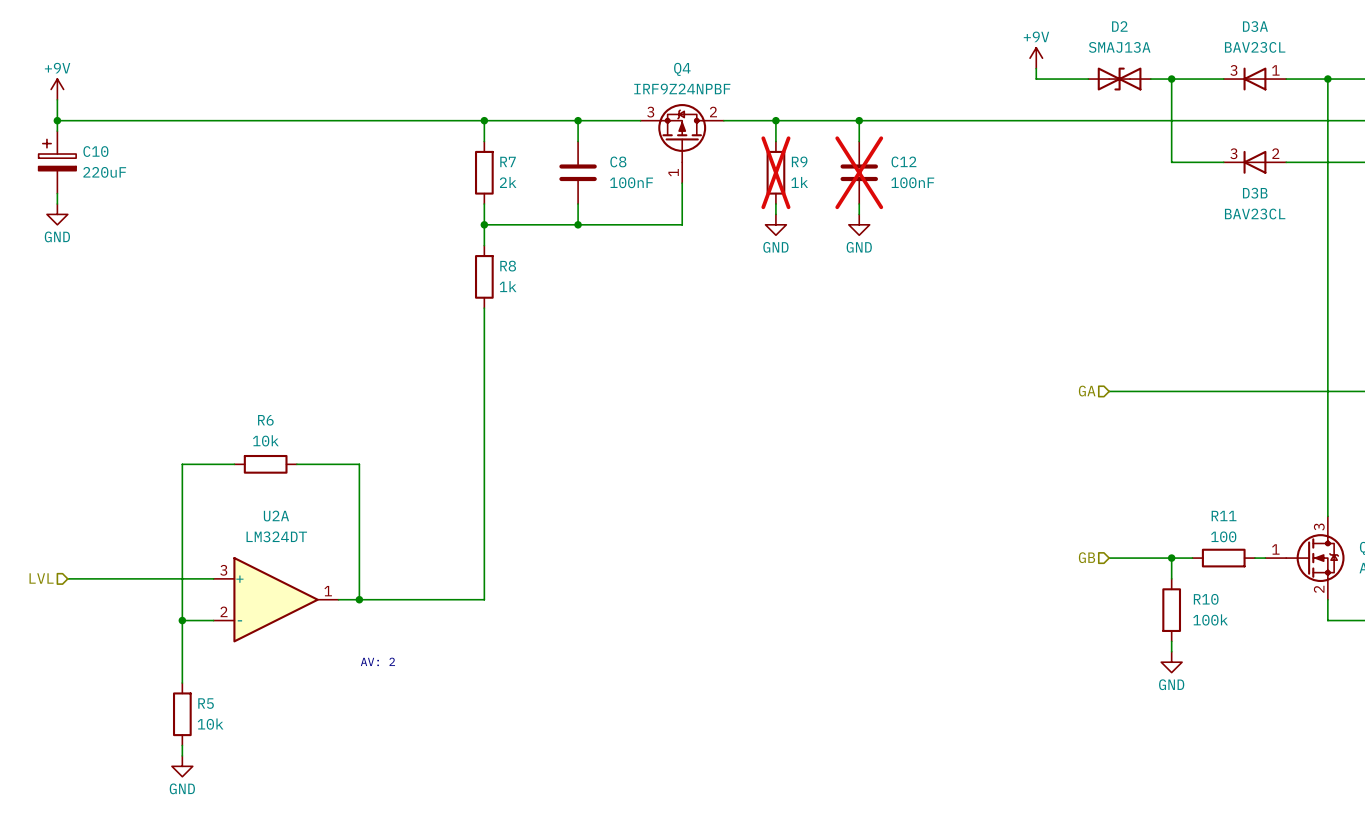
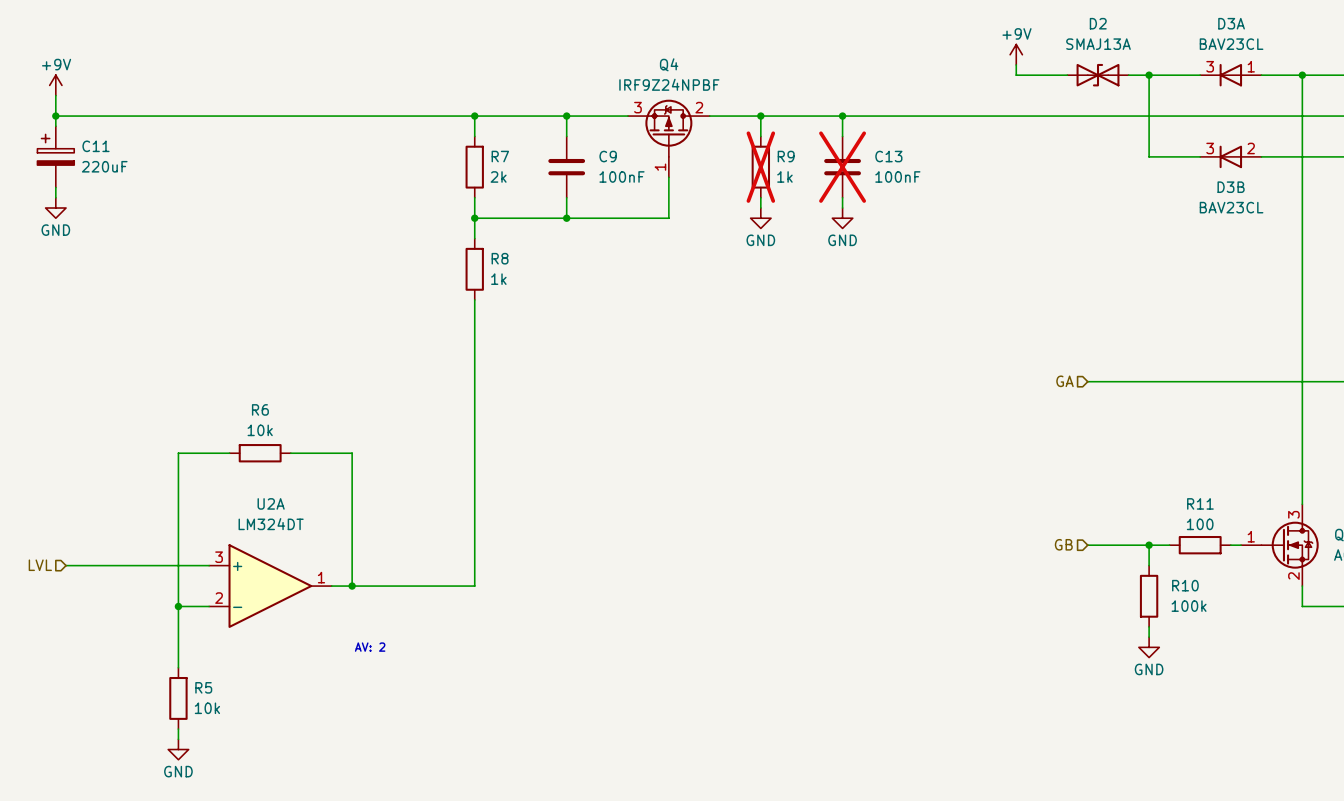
C10 name: C10 (95, 151) -> C11 (95, 146)
C8 name: C8 (618, 161) -> C9 (608, 156)
C12 name: C12 (903, 161) -> C13 (888, 156)

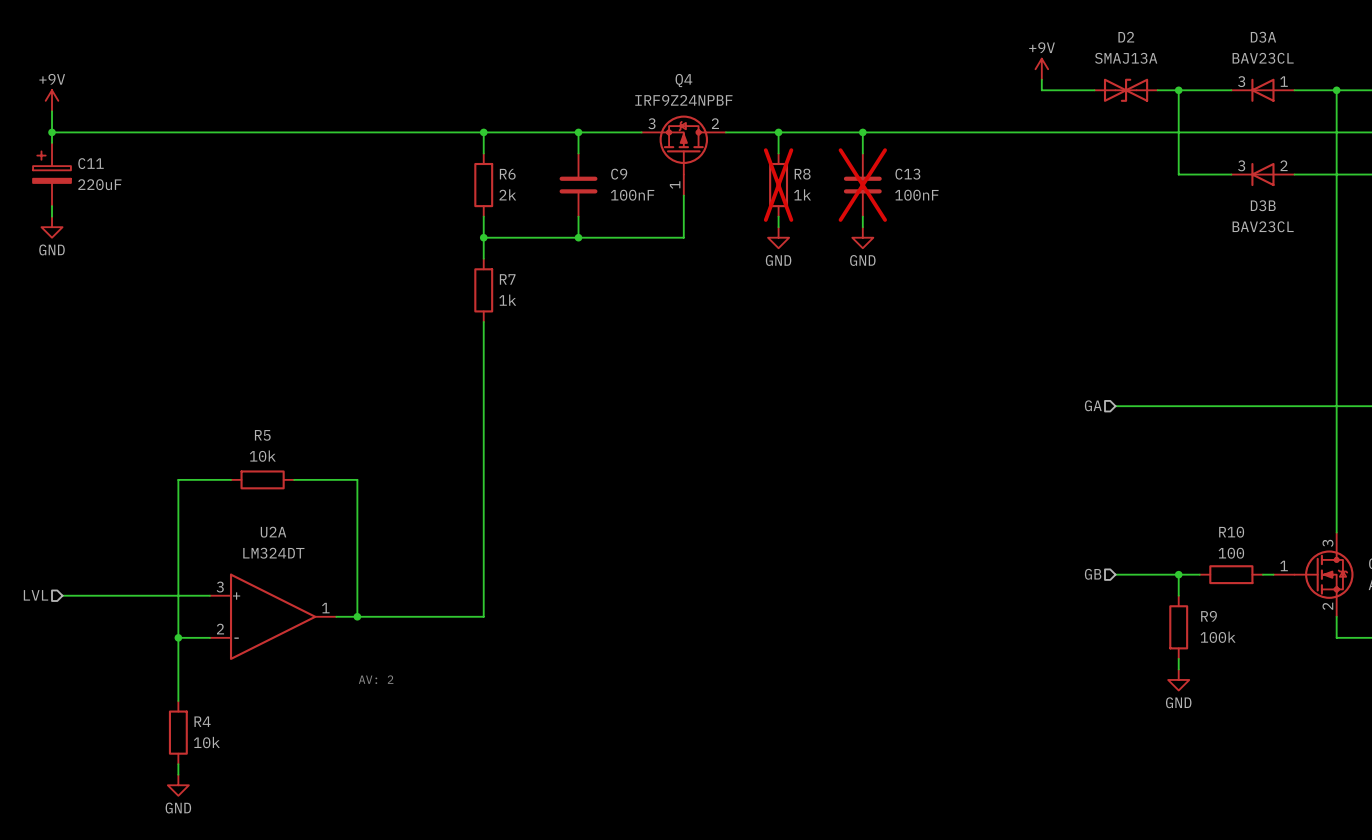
R7 name: R7 (500, 156) -> R6 (507, 174)
R9 name: R9 (786, 156) -> R8 (802, 174)
R8 name: R8 (500, 258) -> R7 (507, 279)
R6 name: R6 (260, 409) -> R5 (262, 435)
R11 name: R11 (1200, 503) -> R10 (1231, 532)
R10 name: R10 (1185, 585) -> R9 (1209, 616)
R5 name: R5 (203, 687) -> R4 (202, 721)

